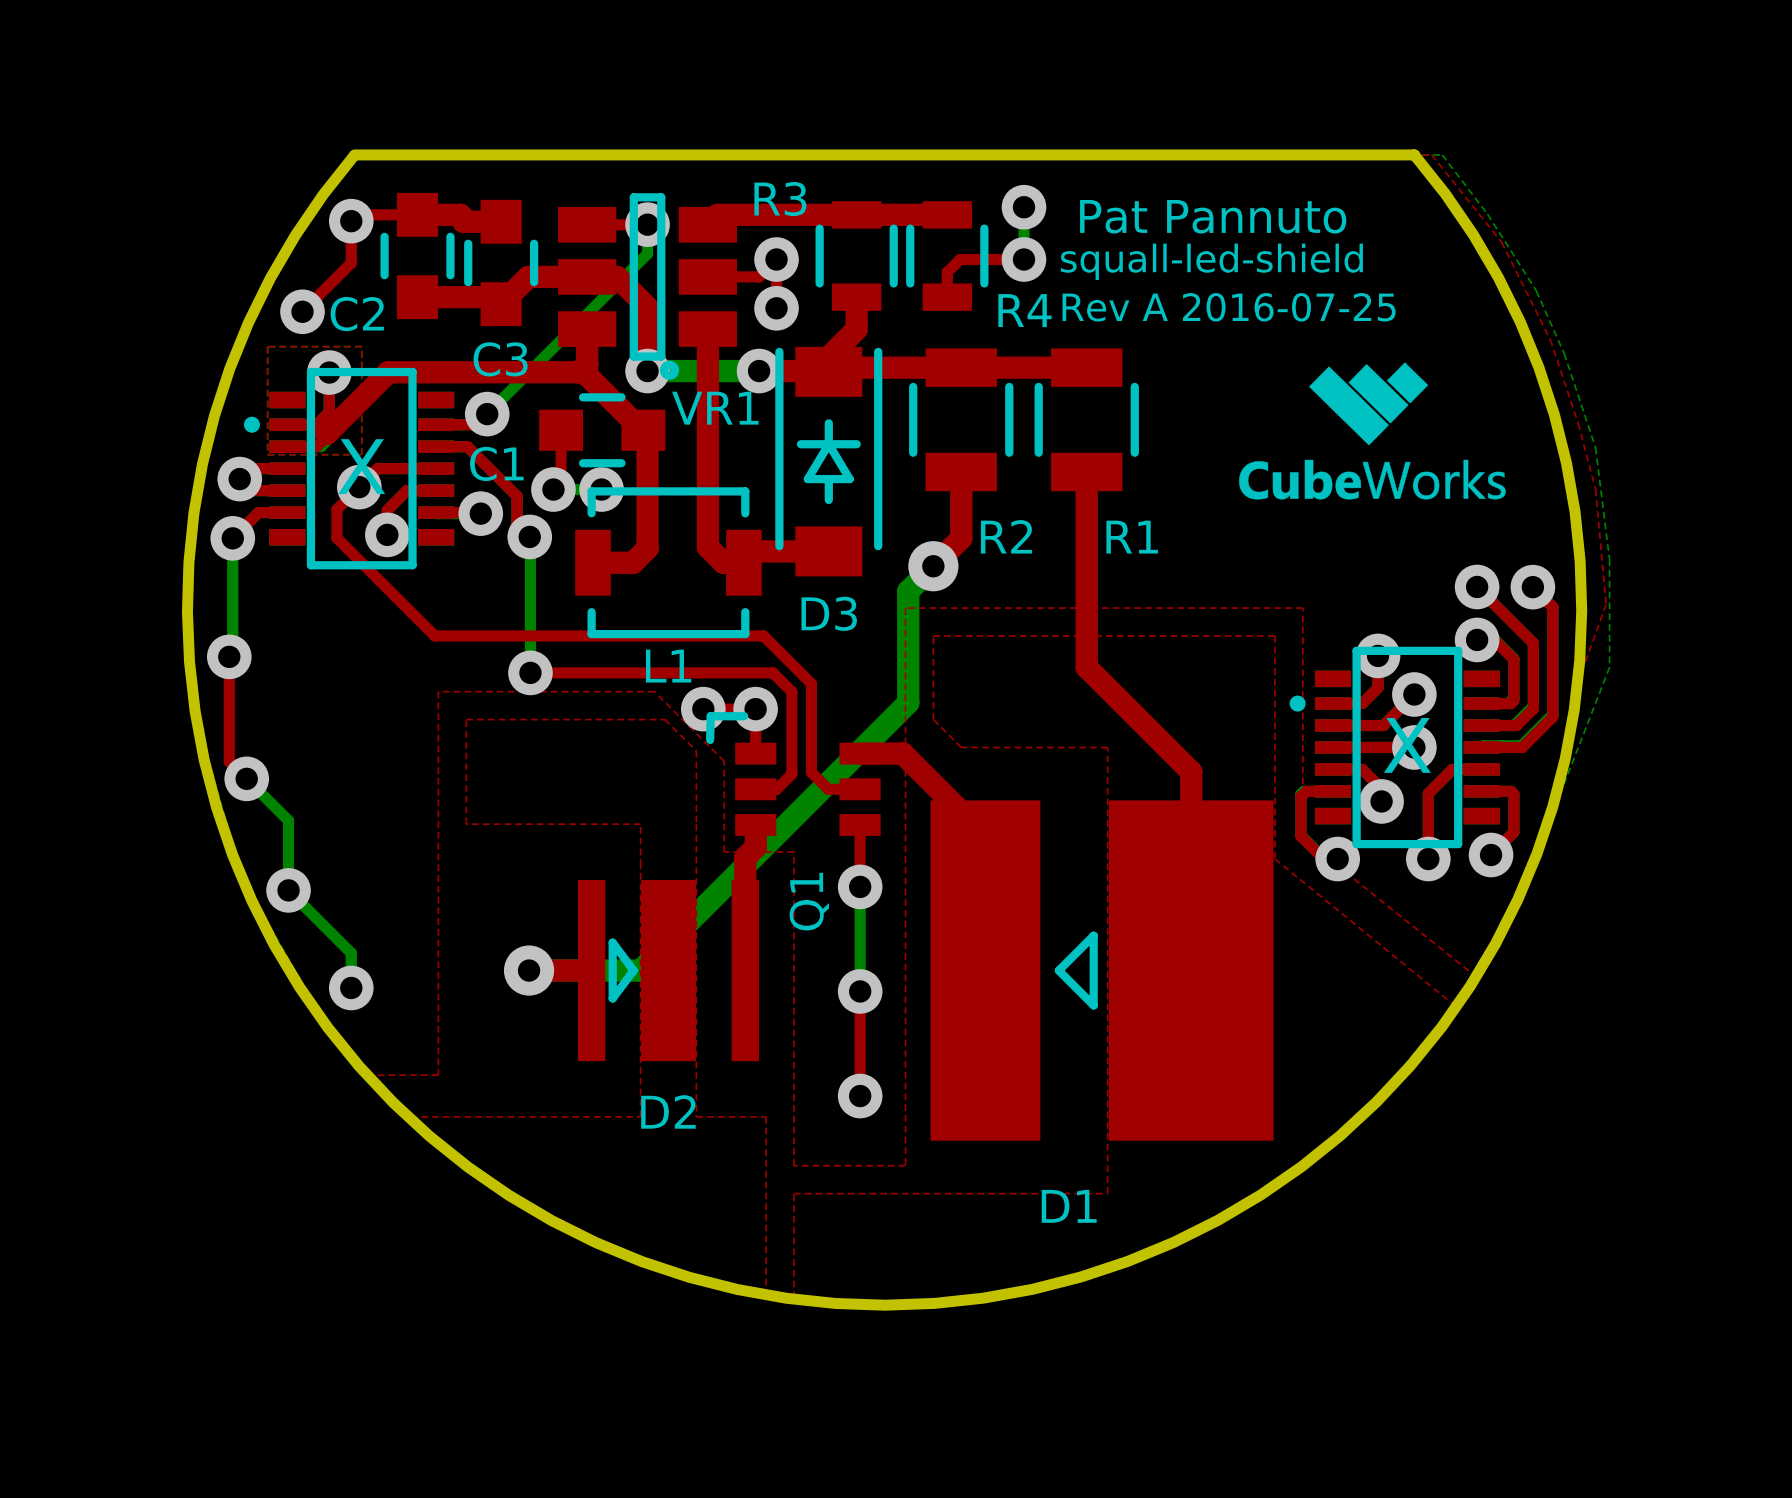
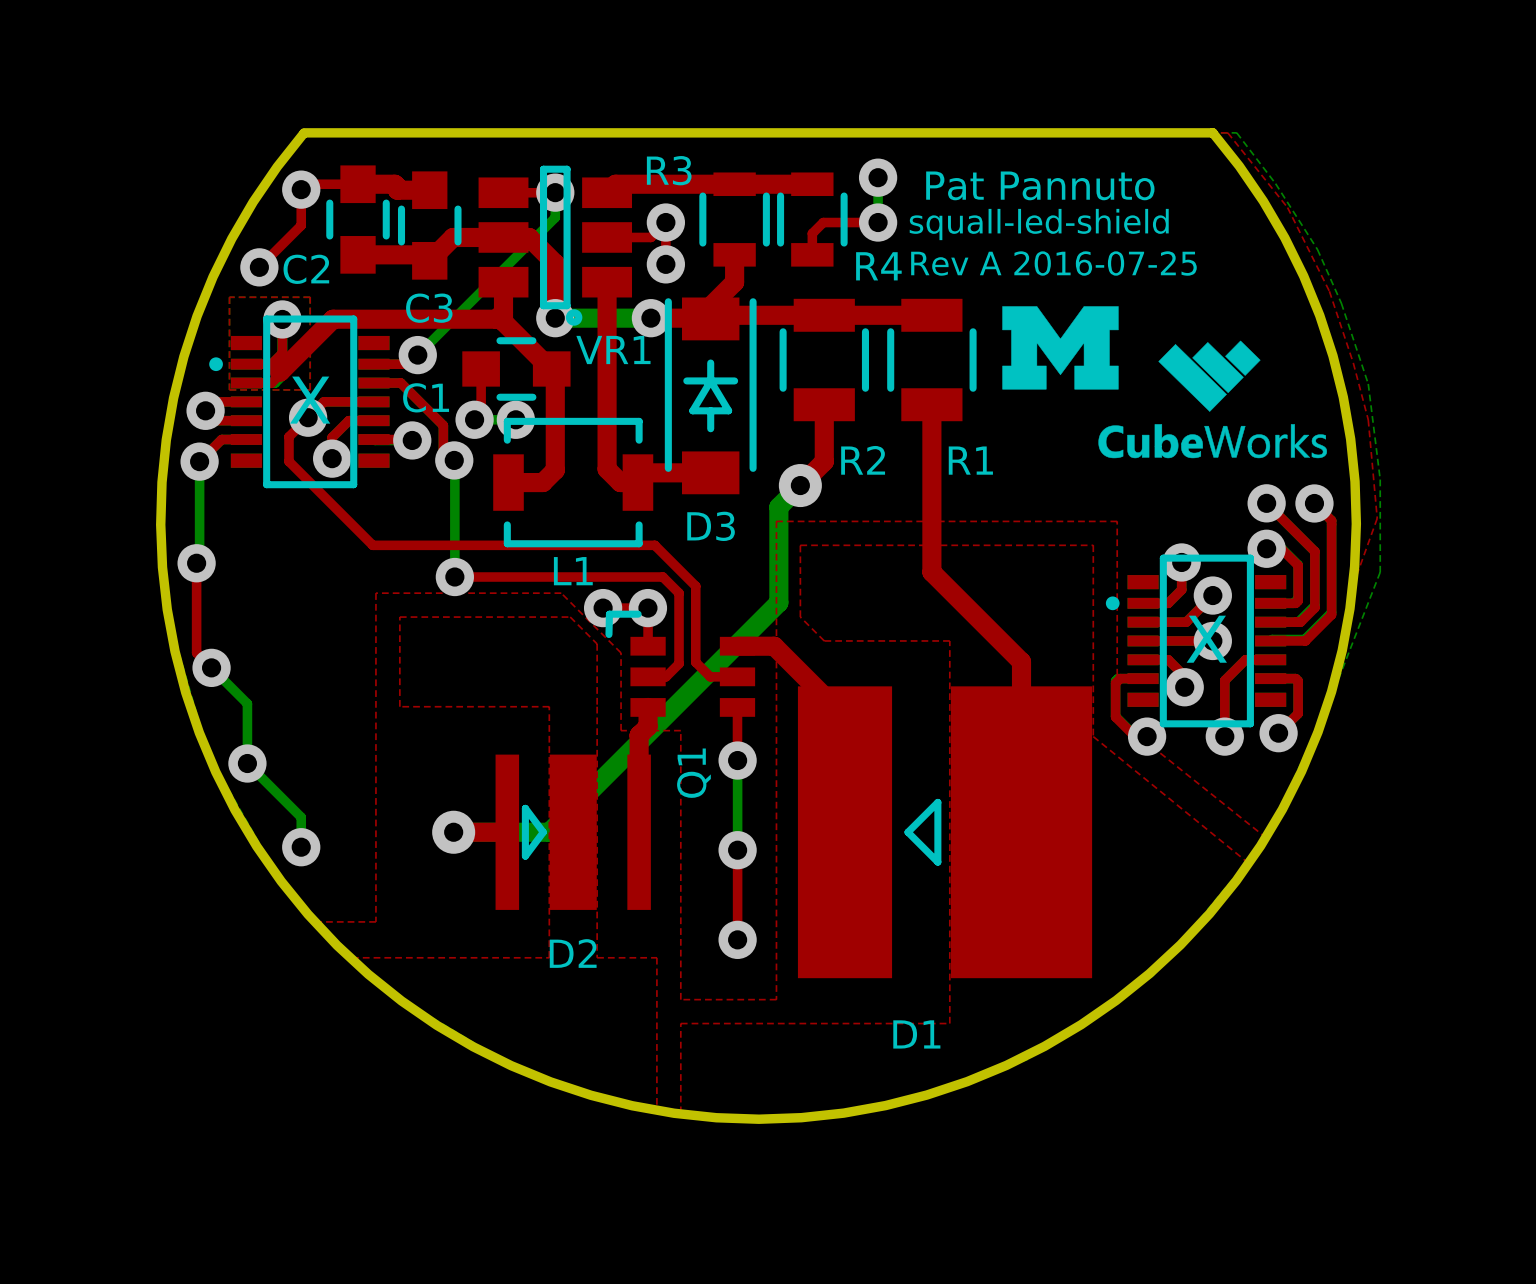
drawing: none -> [1002, 306, 1119, 390]
drawing position: (1372, 430) -> (1212, 399)

